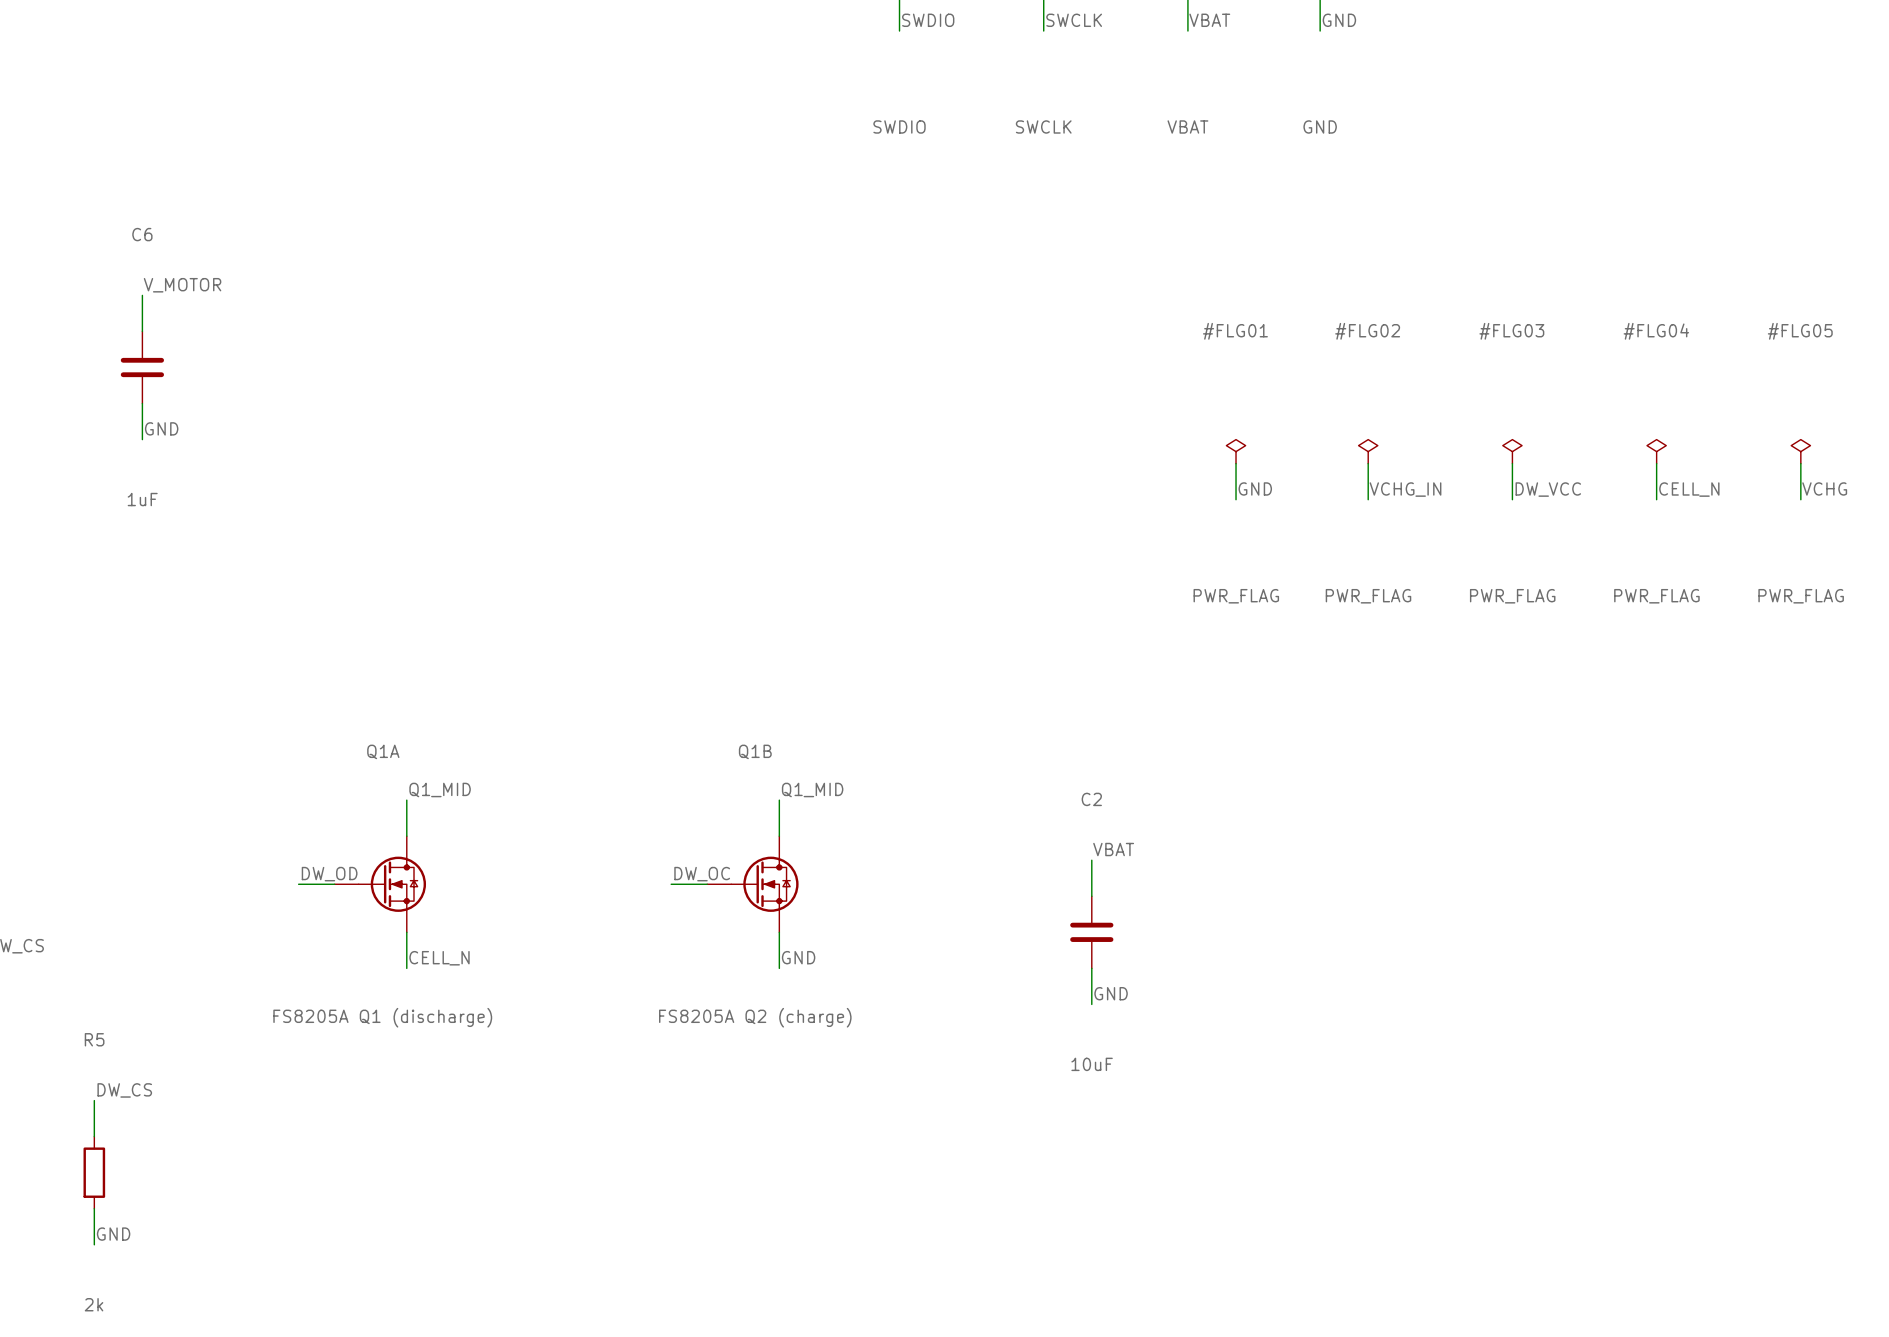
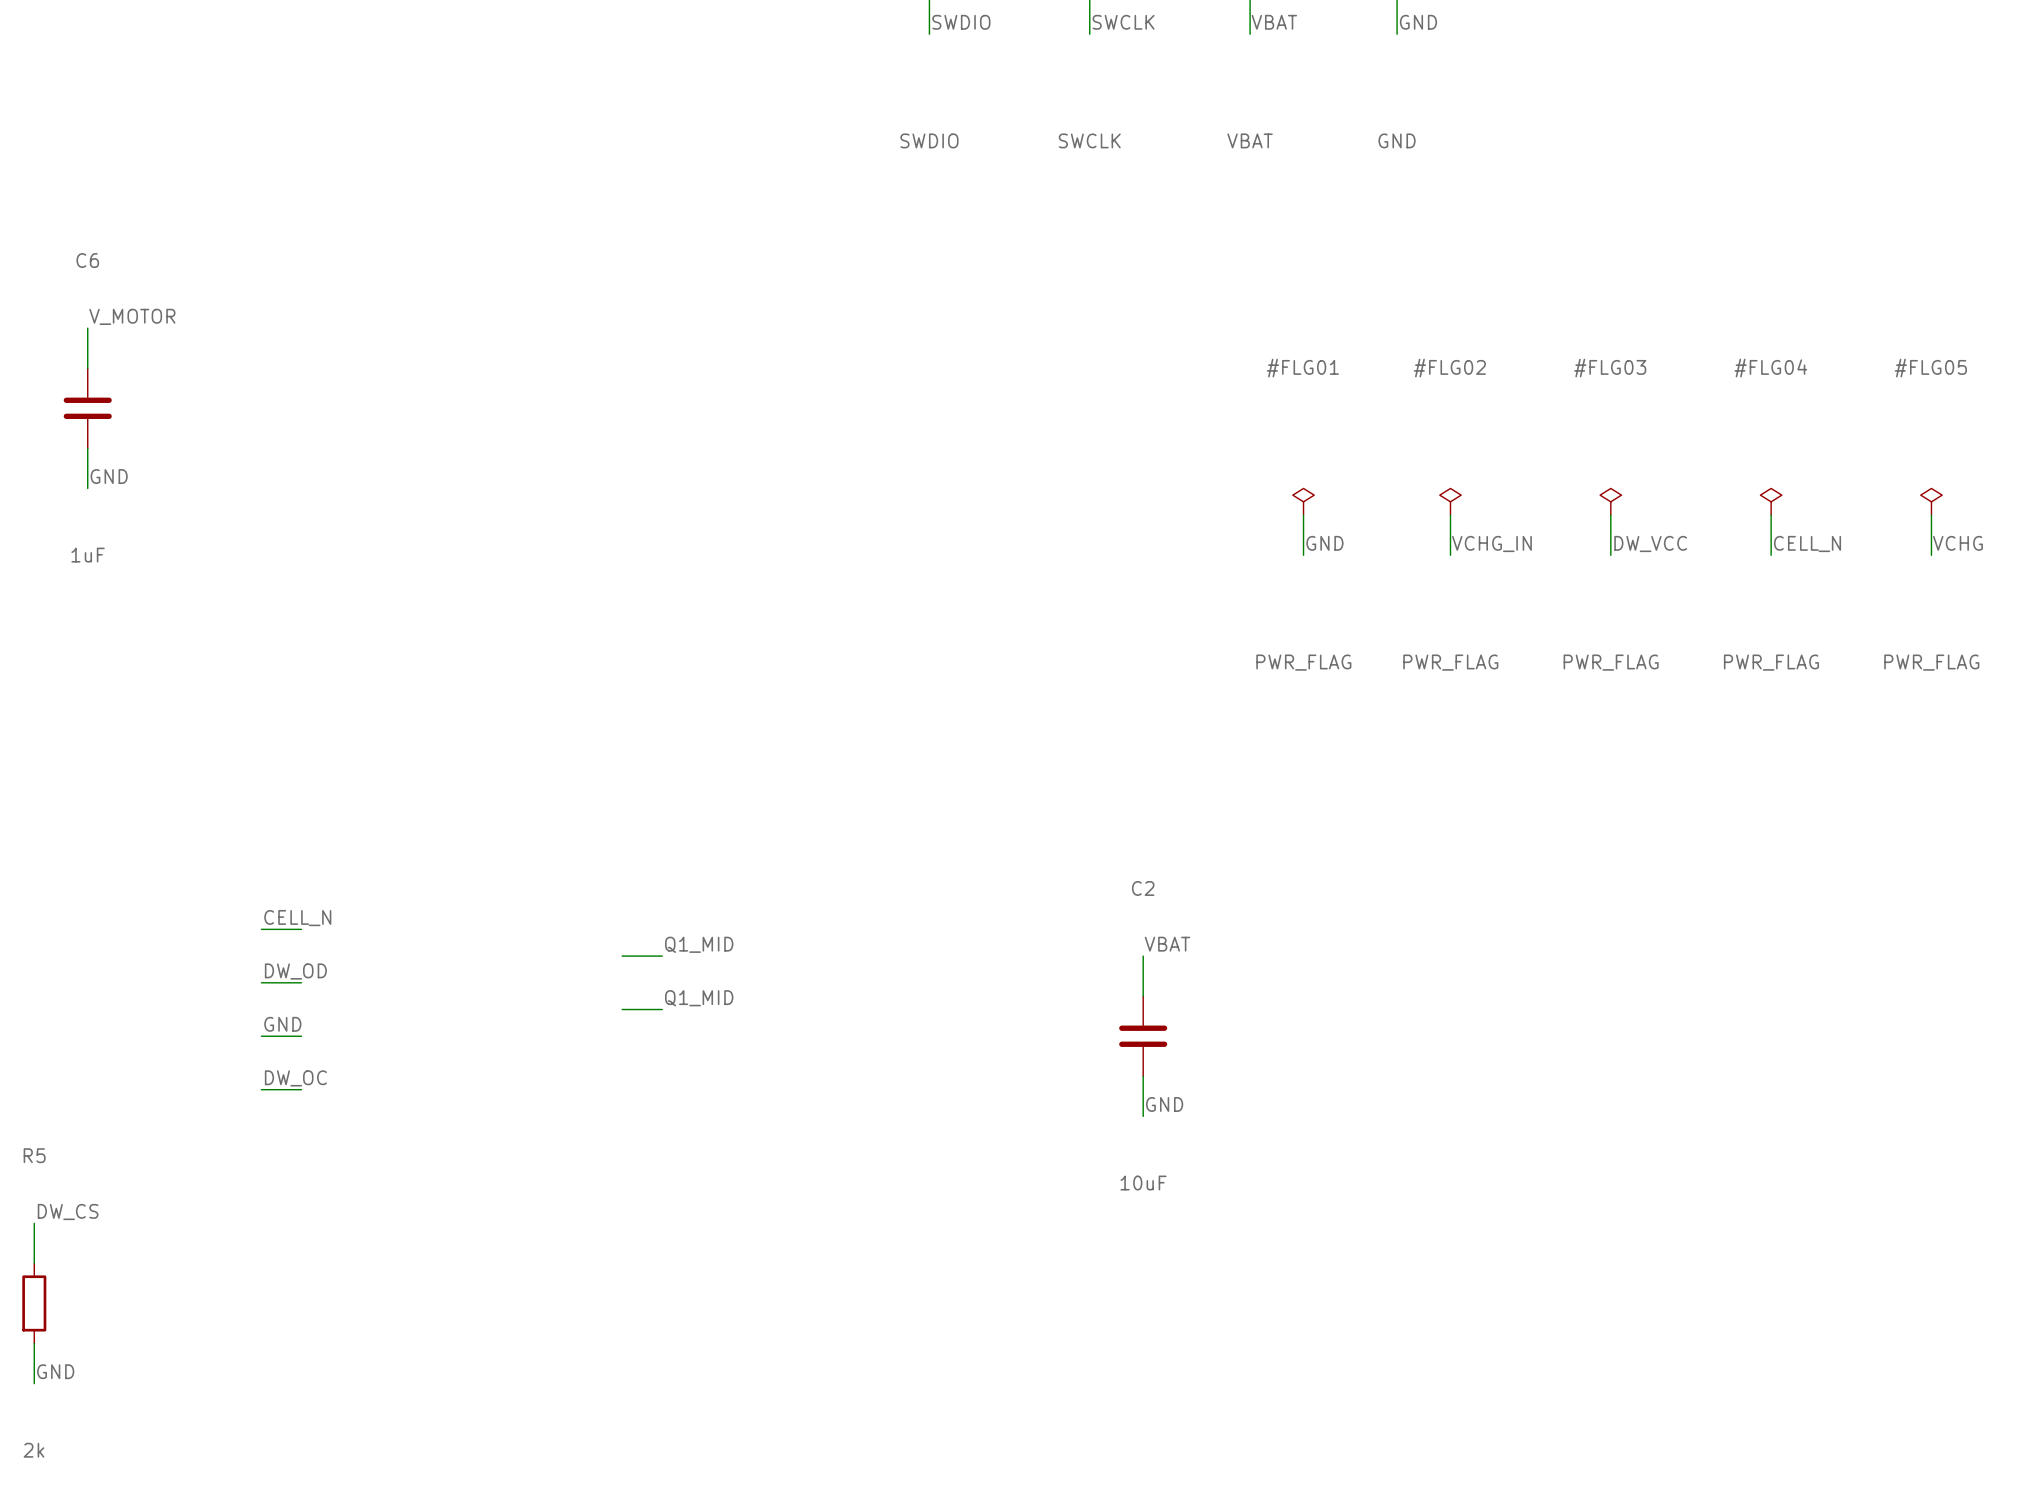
label: Q1_MID (440, 789) -> none
label: Q1_MID (812, 789) -> none
wire: (406, 800) (406, 836) -> none
wire: (779, 800) (779, 836) -> none
wire: none -> (261, 929) (301, 929)
label: none -> Q1_MID (699, 944)
label: DW_OC (702, 874) -> none
Q1A: FS8205A Q1 (discharge) (380, 884) -> none
wire: (671, 884) (707, 884) -> (622, 956) (662, 956)
Q1B: FS8205A Q2 (charge) (752, 884) -> none
label: none -> Q1_MID (699, 998)
wire: none -> (622, 1009) (662, 1009)
label: none -> GND (282, 1024)
wire: none -> (261, 1036) (301, 1036)
wire: (406, 932) (406, 968) -> none
wire: (779, 932) (779, 968) -> none
label: GND (798, 957) -> none
label position: CELL_N (439, 958) -> CELL_N (297, 918)
label: none -> DW_OC (295, 1078)
wire: none -> (261, 1089) (301, 1089)

